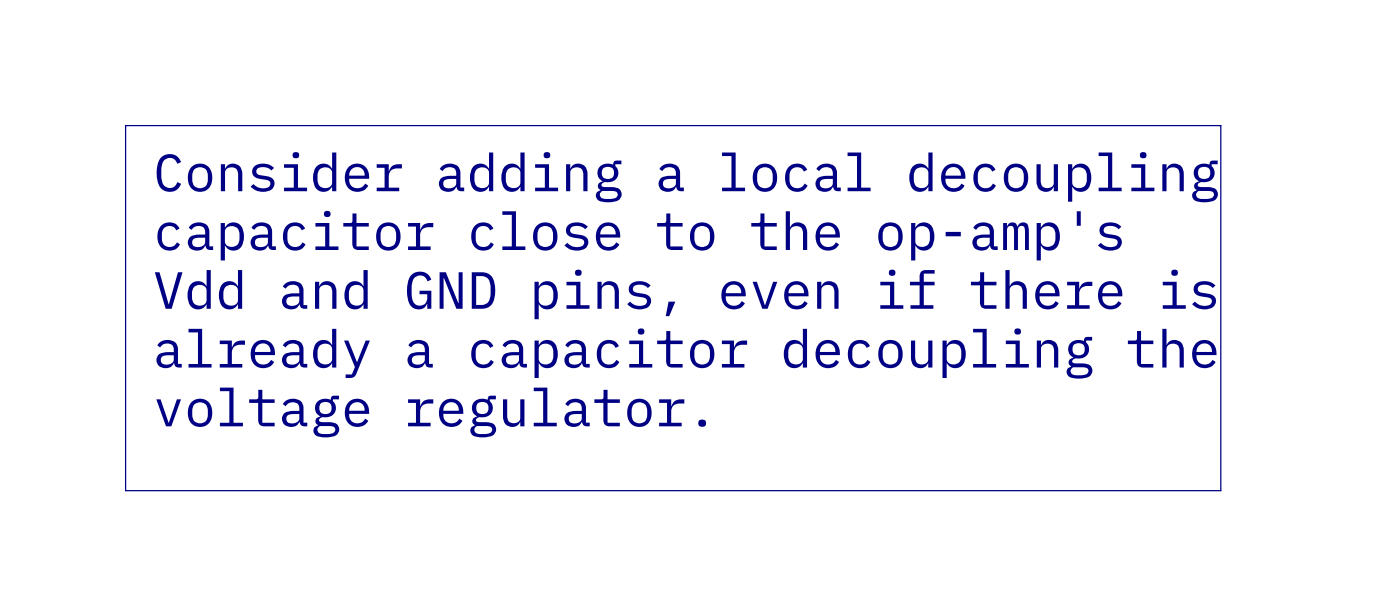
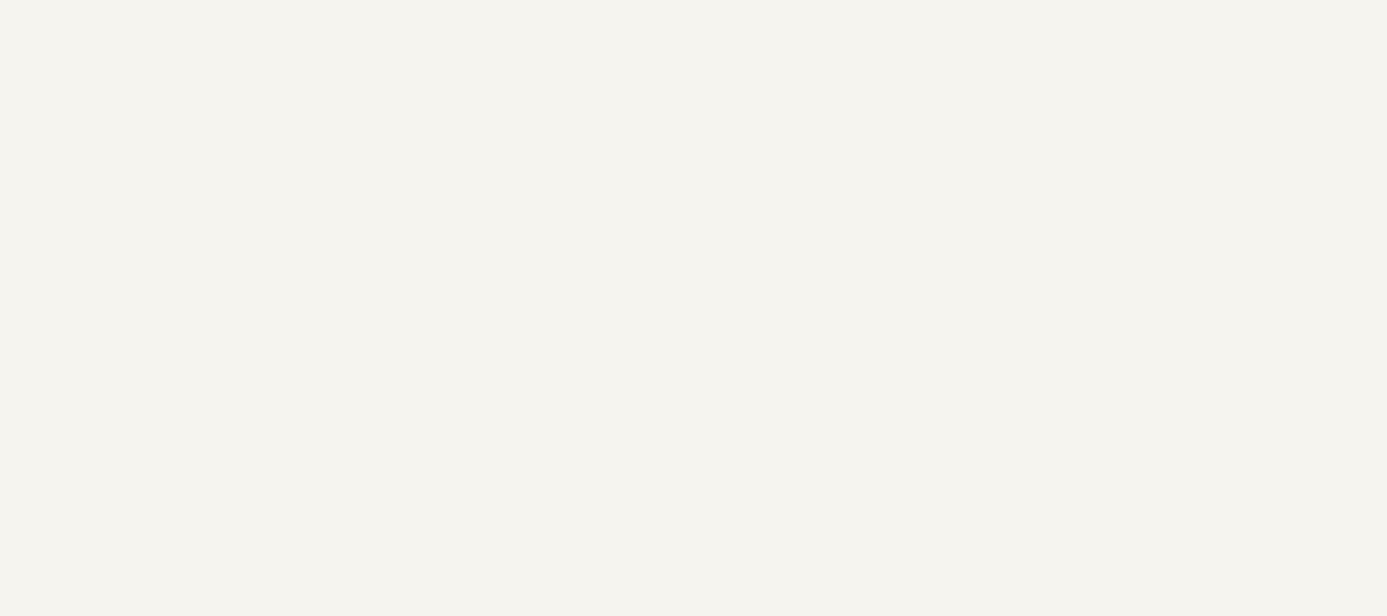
line: (125, 125) (1220, 125) (1220, 490) (125, 490) (125, 125) -> none
text: Consider adding a local decoupling (687, 177) -> none
text: capacitor close to the op-amp's (639, 235) -> none
text: Vdd and GND pins, even if there is (685, 294) -> none
text: already a capacitor decoupling the (686, 353) -> none
text: voltage regulator. (431, 412) -> none

